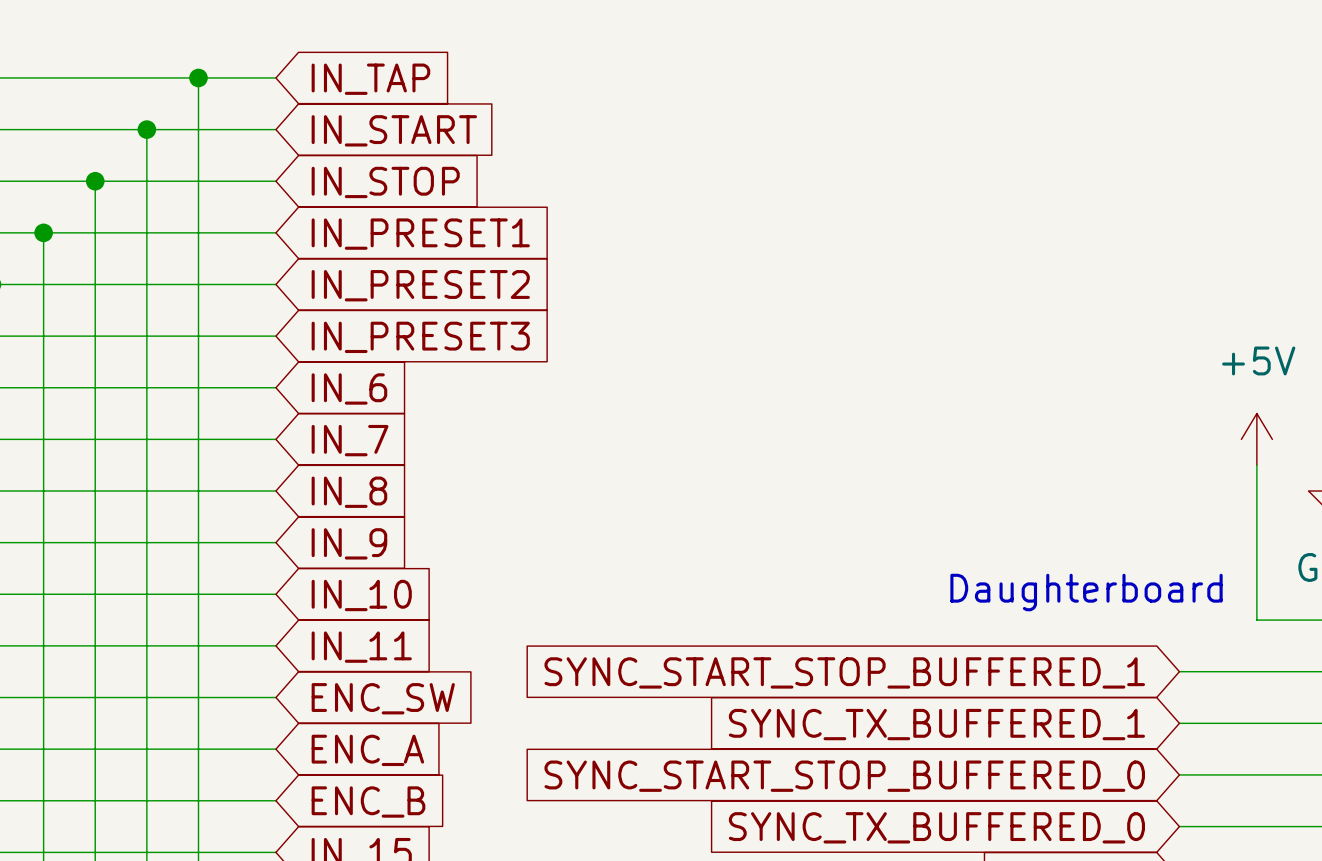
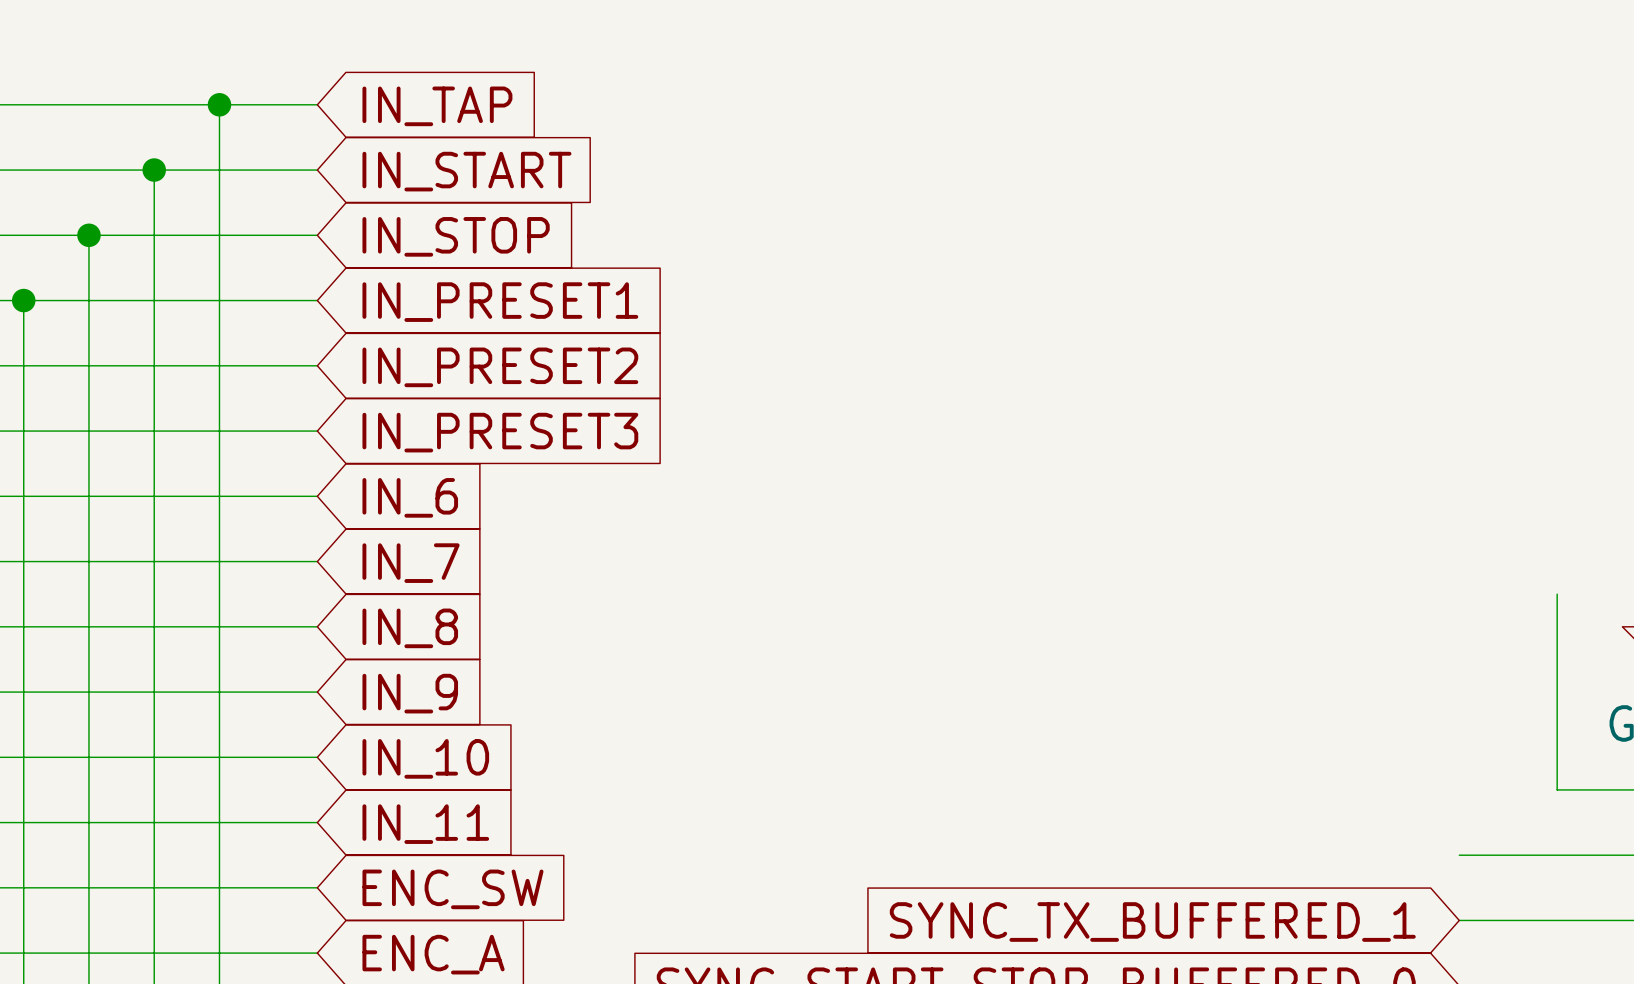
power symbol: +5V (1256, 439) -> none
text: Daughterboard (1086, 592) -> none
global label: SYNC_START_STOP_BUFFERED_1 (844, 672) -> none

